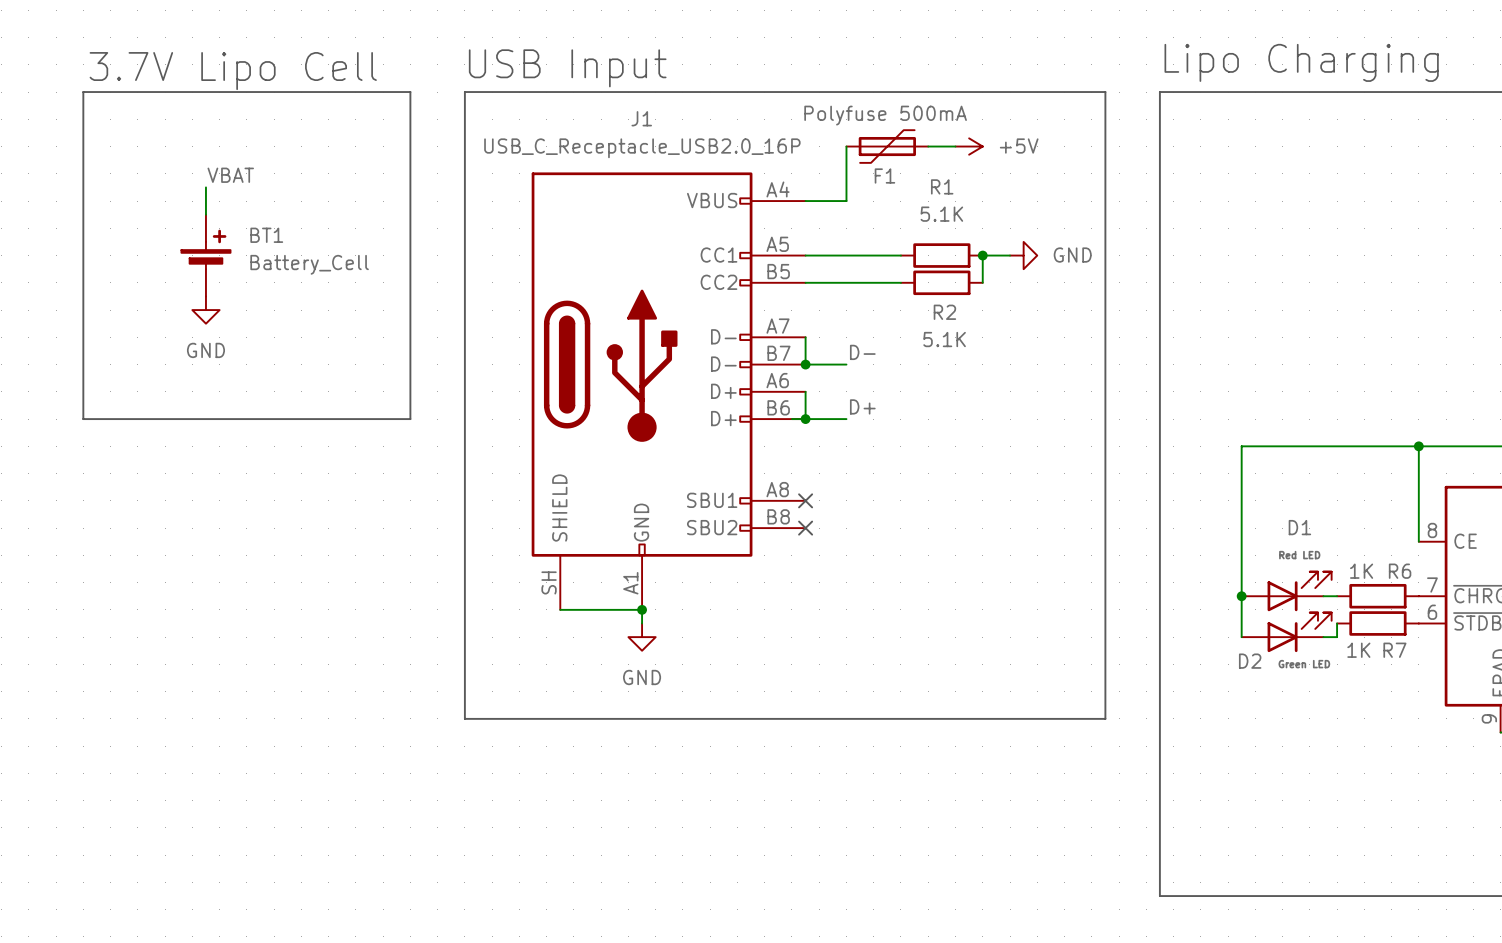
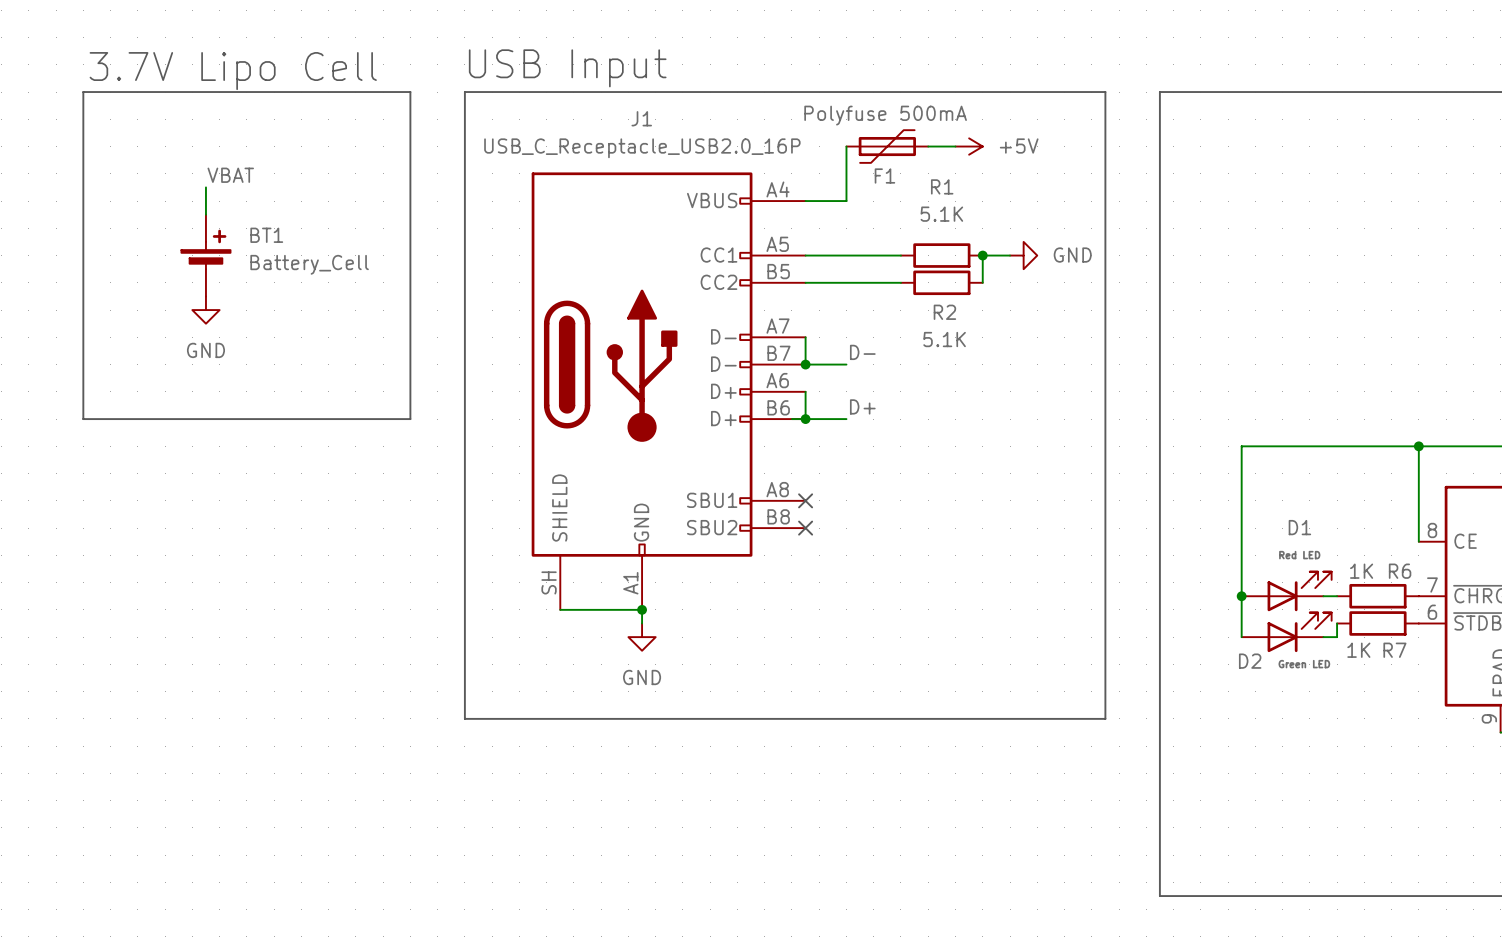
text: Lipo Charging (1301, 62) -> none

